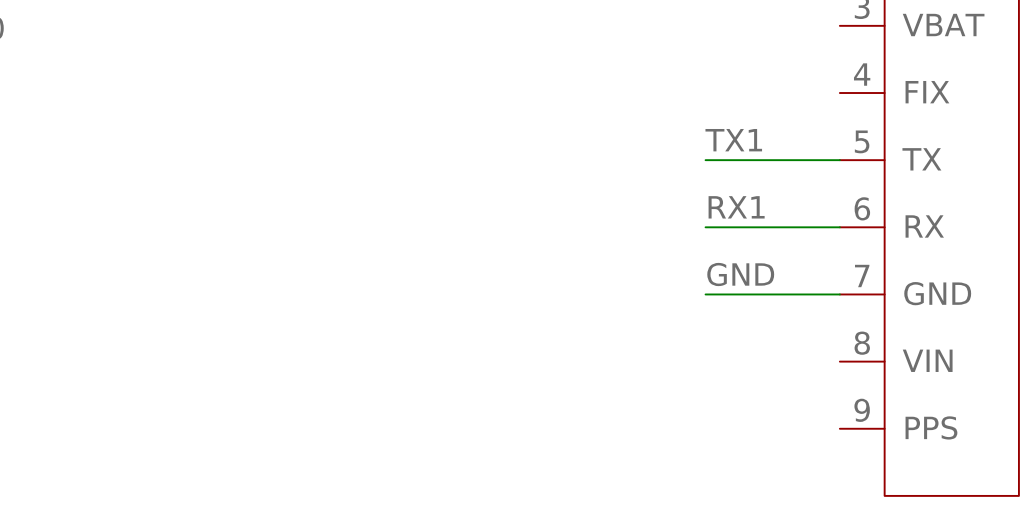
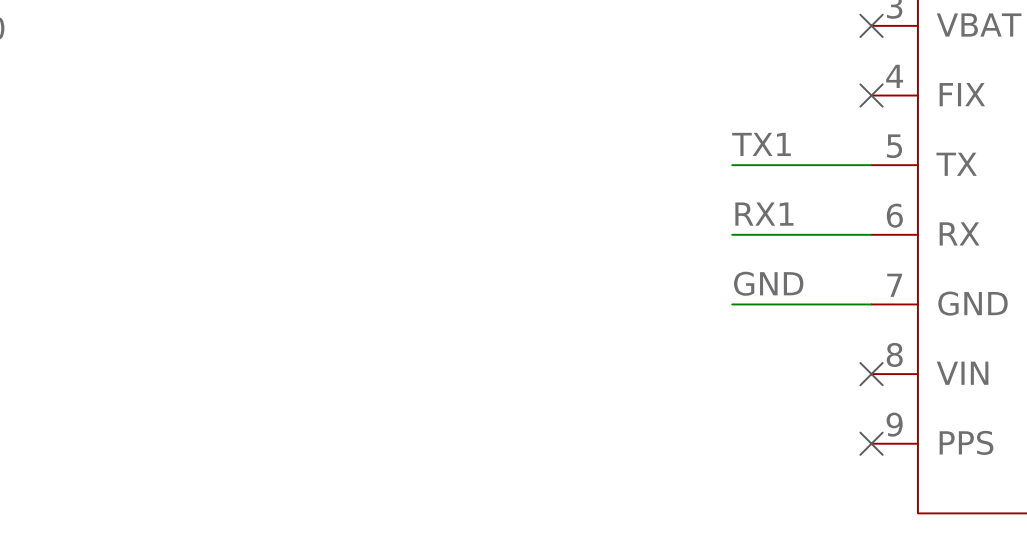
no-connect mark: none -> (871, 25)
no-connect mark: none -> (871, 95)
no-connect mark: none -> (871, 374)
no-connect mark: none -> (871, 443)

